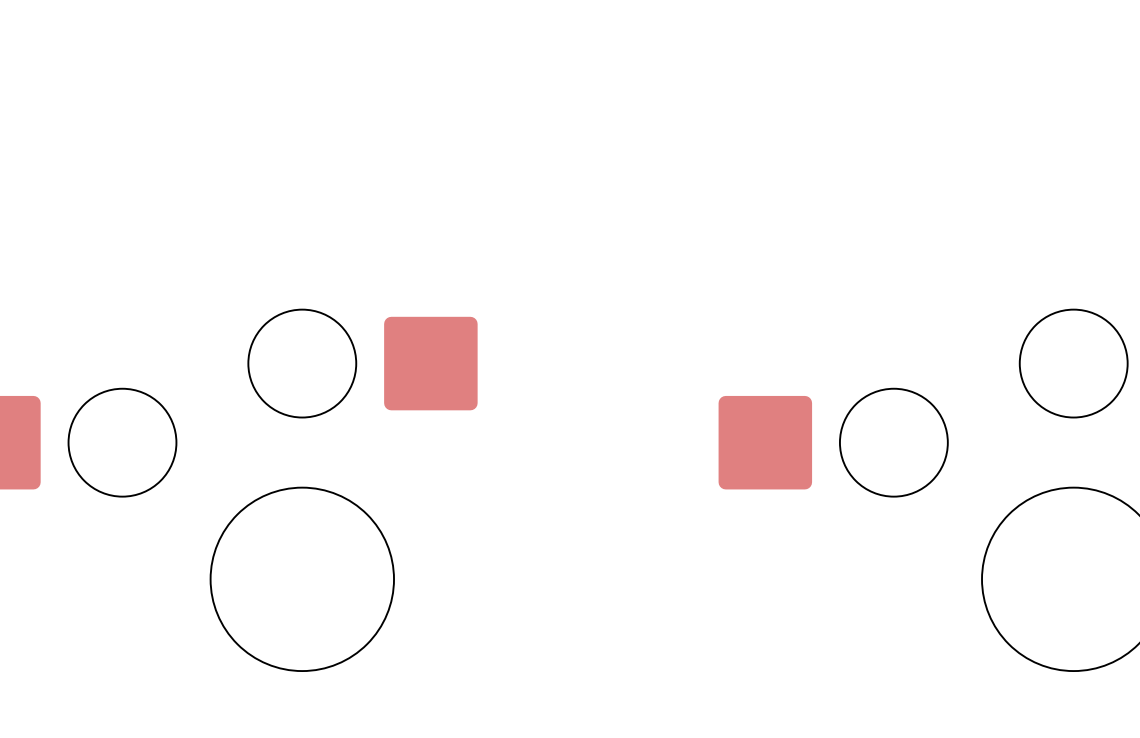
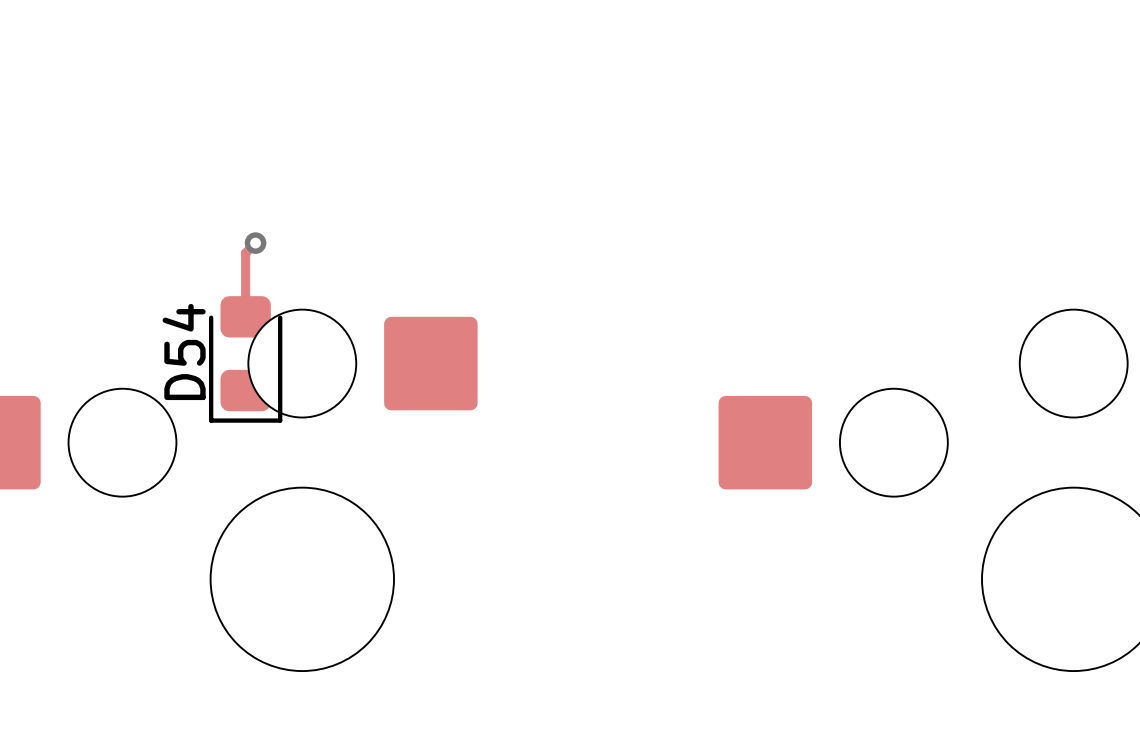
track: none -> (255, 243) (245, 252) (245, 315)
via: none -> (255, 243)
D54: none -> (245, 359)

